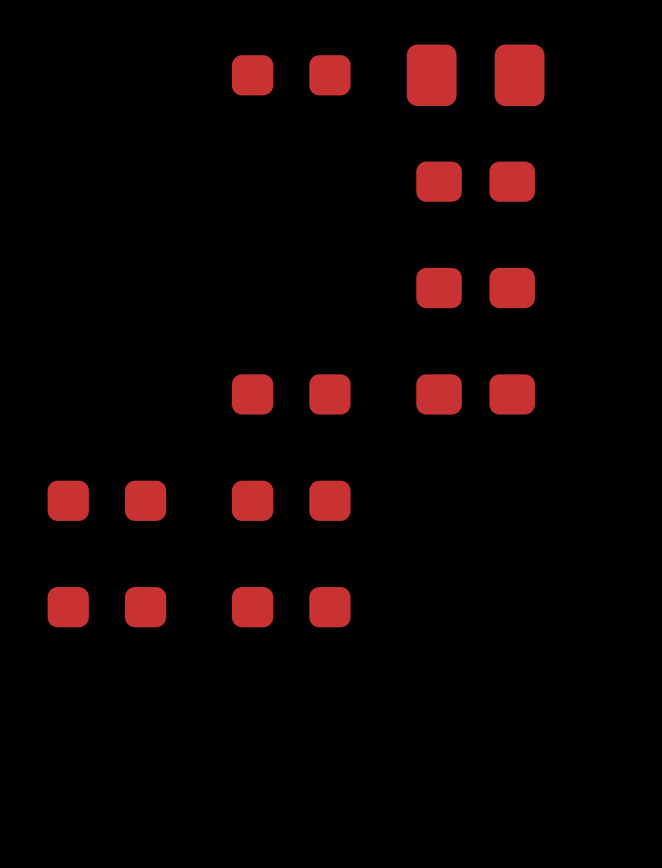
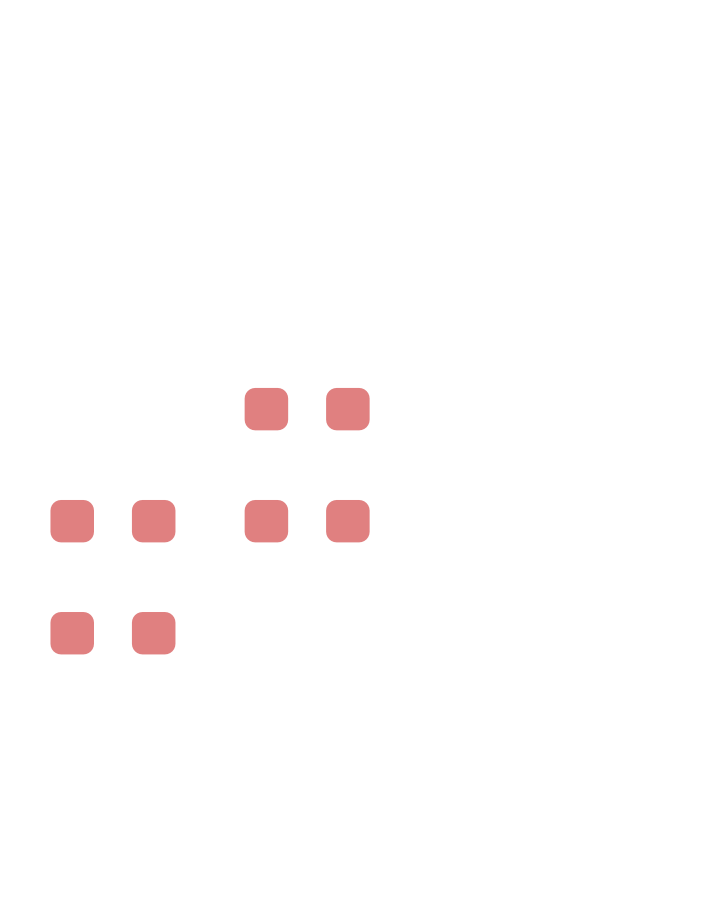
part: (291, 75) -> none
part: (475, 75) -> none
part: (475, 181) -> none
part: (475, 288) -> none
part: (475, 394) -> none
part: (291, 607) -> none

